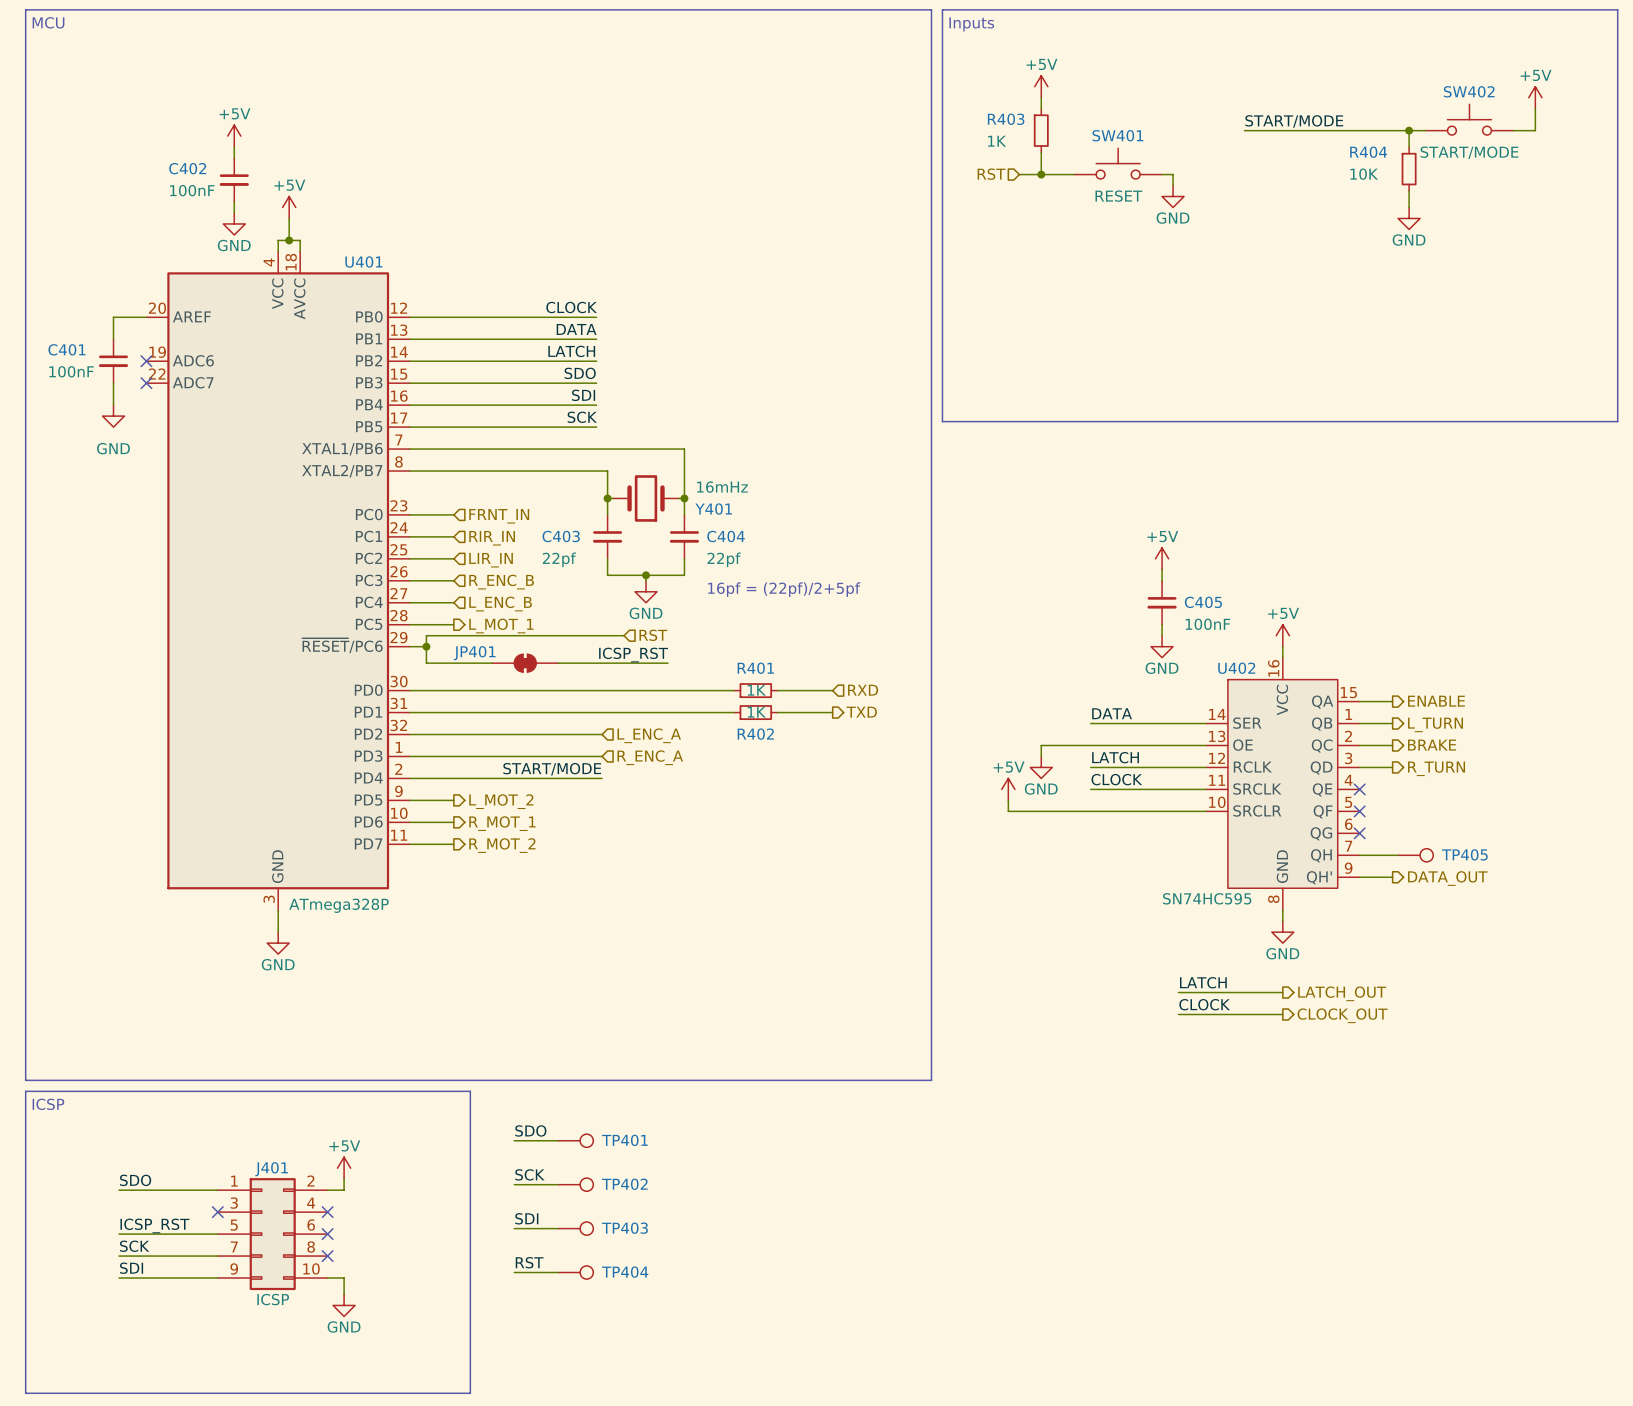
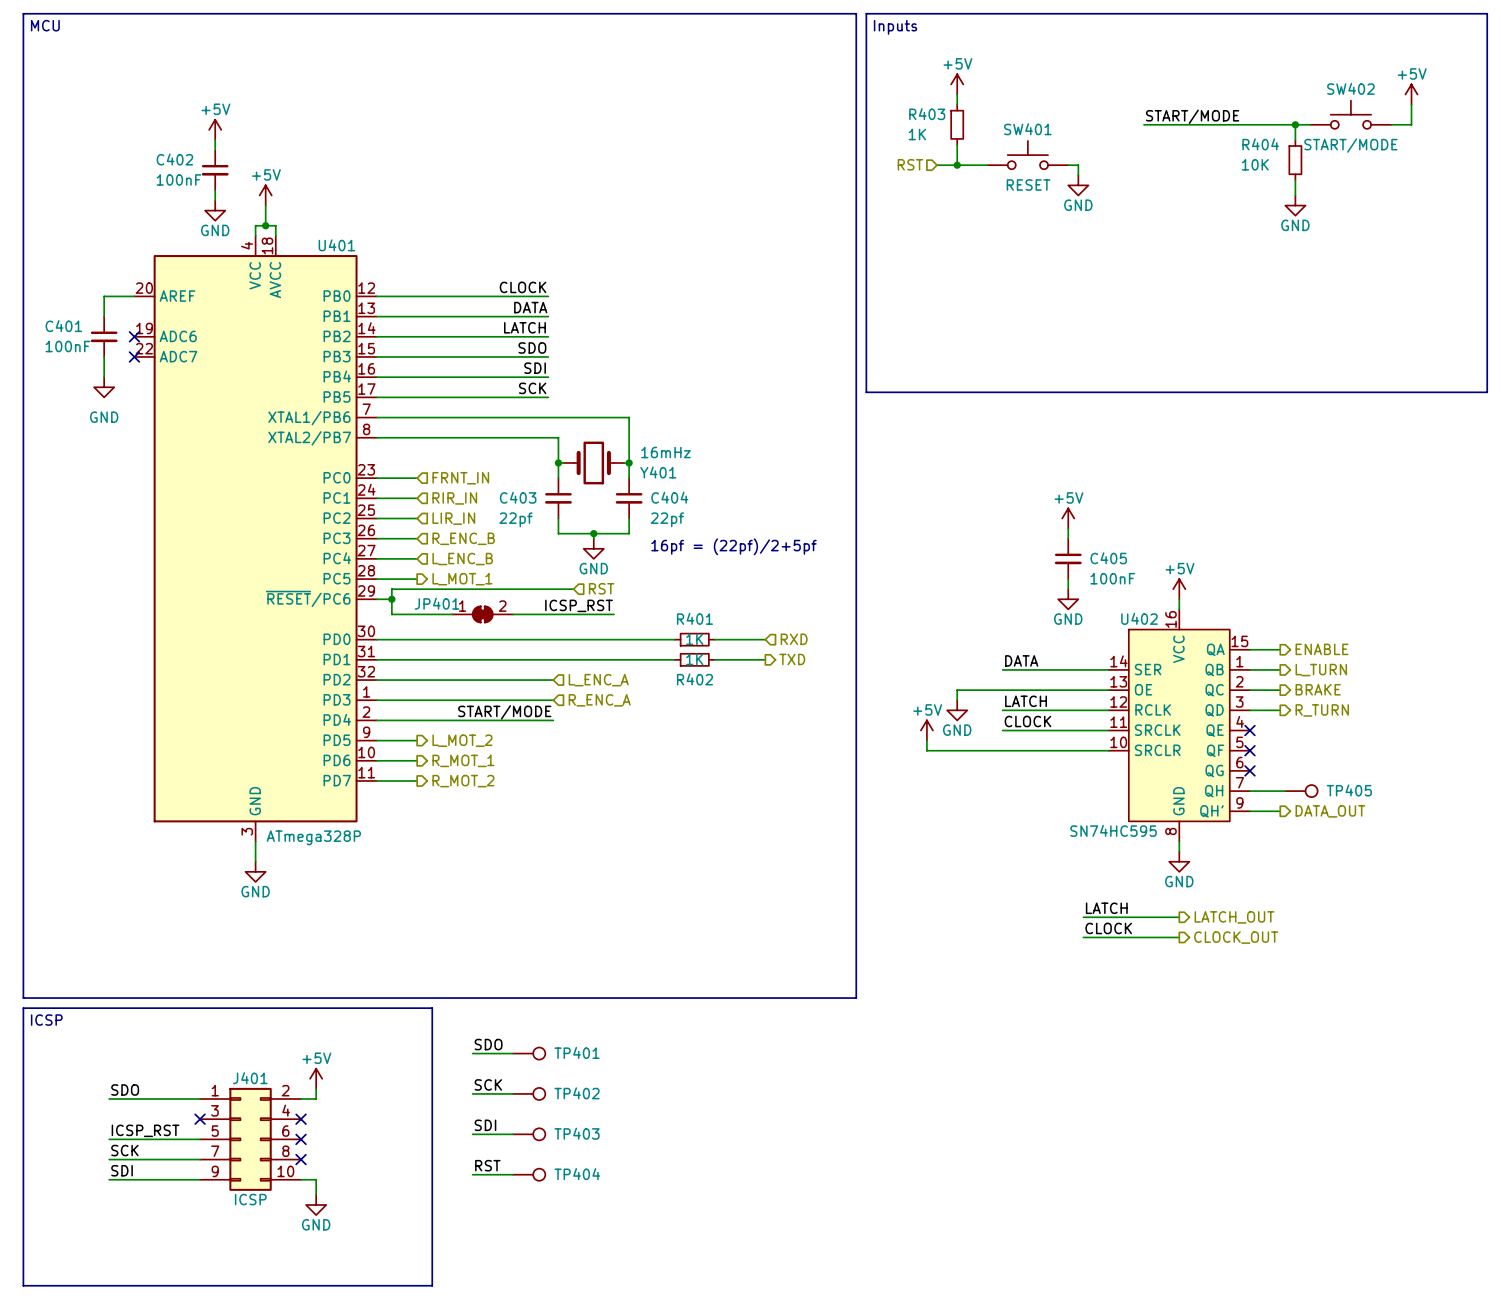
JP401 pin number: none -> 1 (462, 606)
JP401 pin number: none -> 2 (502, 606)

